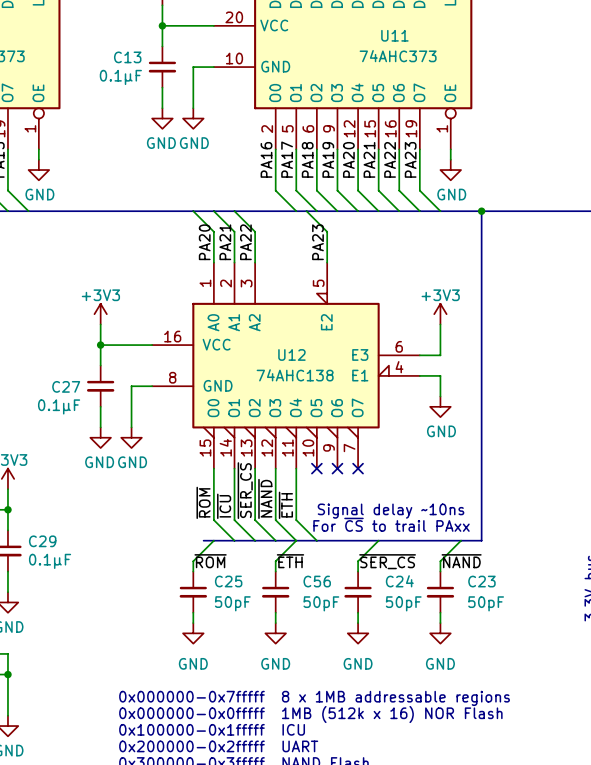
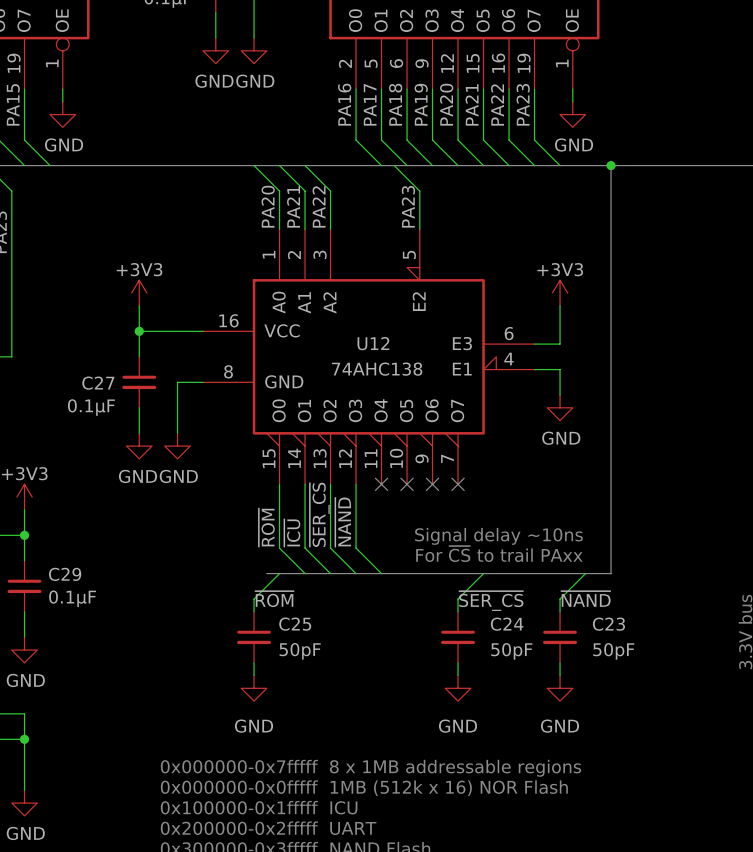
wire: (296, 468) (296, 520) (316, 540) -> none
no-connect mark: none -> (381, 484)
label: ~{ETH} (285, 505) -> none
wire: (296, 540) (275, 561) (275, 571) -> none
label: ~{ETH} (290, 561) -> none
C56: 50pF (275, 592) -> none
wire: (275, 612) (275, 623) -> none
power symbol: GND (275, 633) -> none

